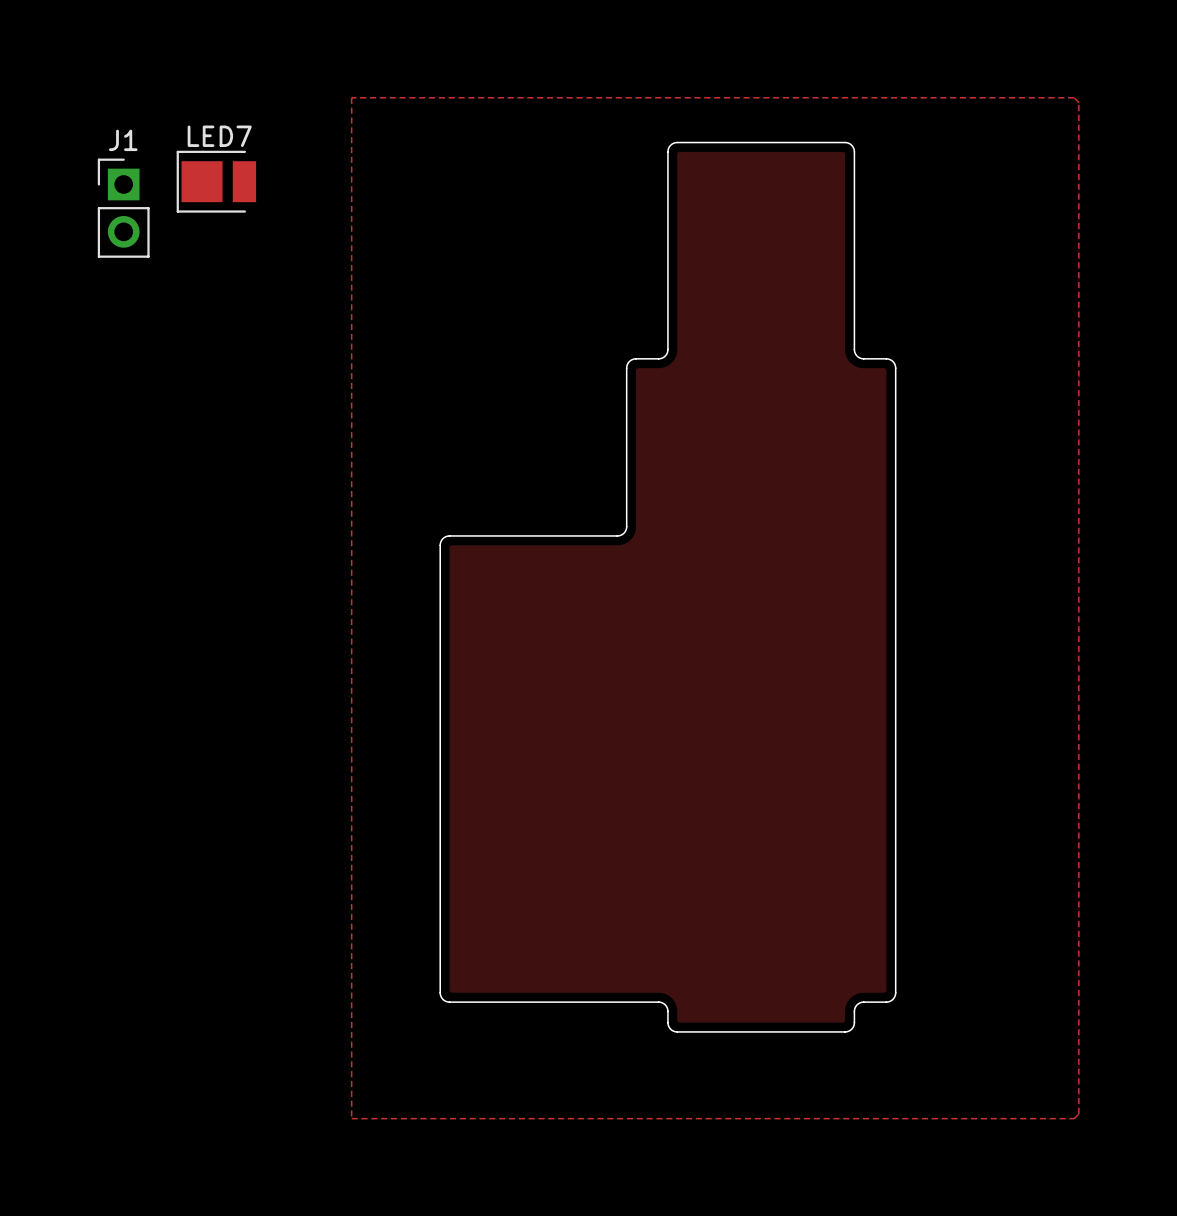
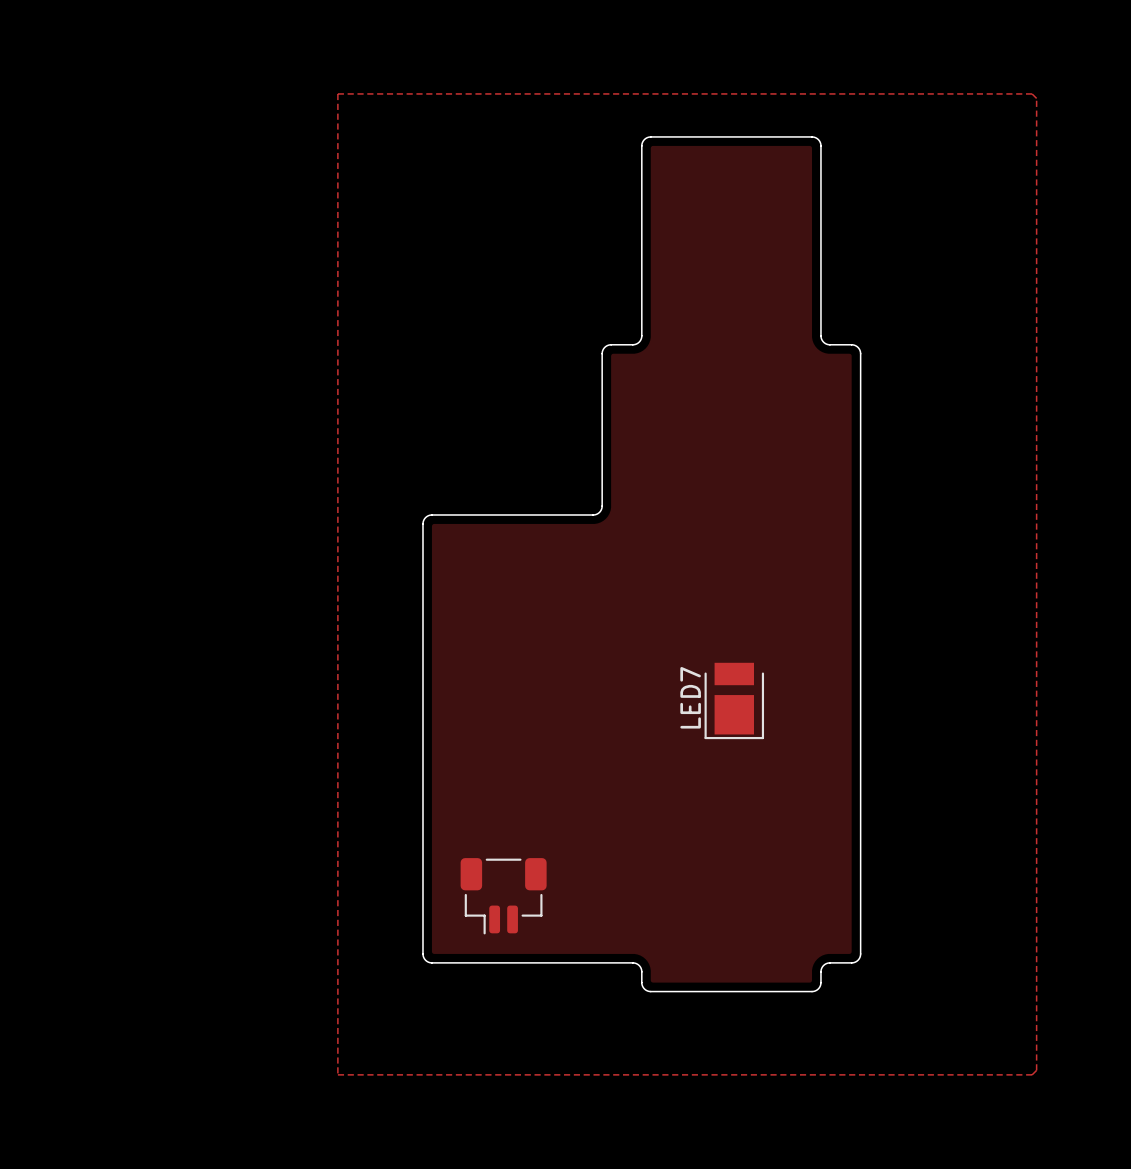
LED7 rotation: 0° (216, 181) -> 90° counterclockwise (734, 700)
LED7 position: (216, 181) -> (734, 700)
J1: (123, 208) -> none
part: none -> (503, 896)

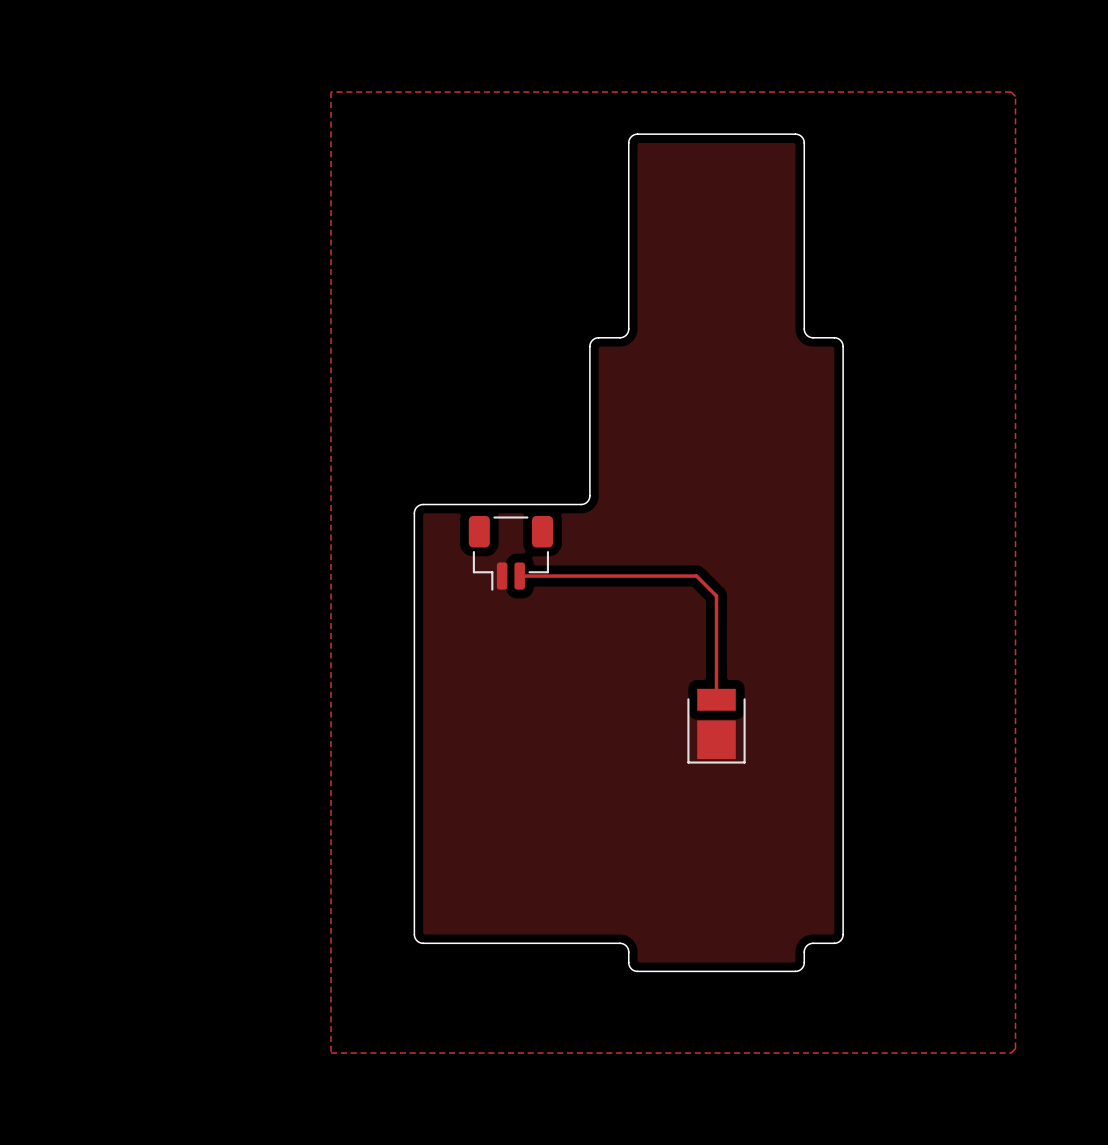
track: none -> (519, 576) (696, 576) (716, 596) (716, 699)
LED7: (734, 700) -> none
part: none -> (716, 726)
part position: (503, 896) -> (510, 553)

